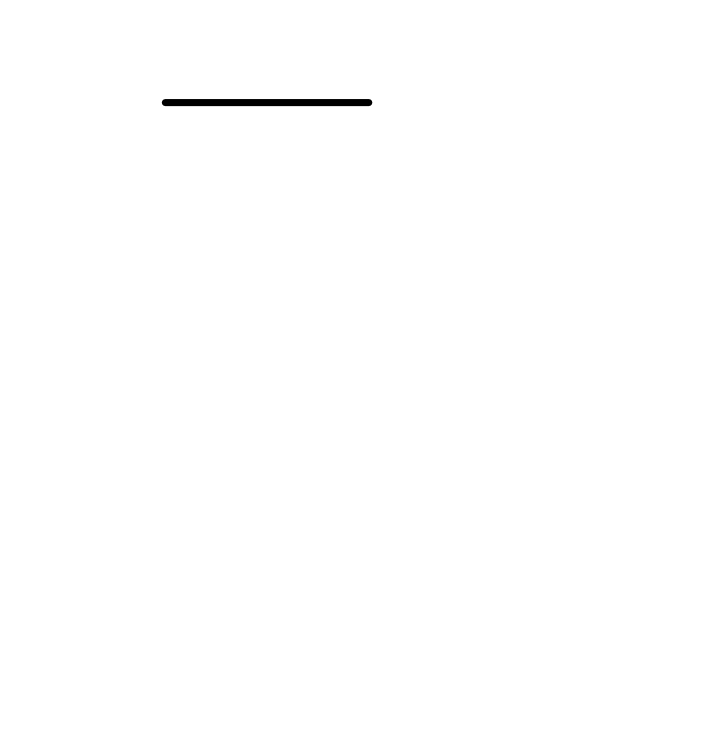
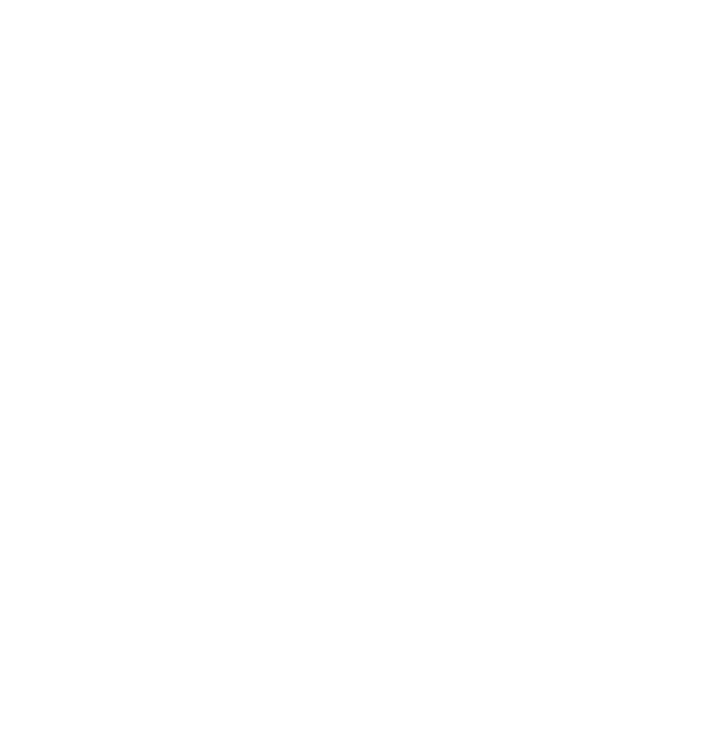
line: (165, 102) (368, 102) -> none

